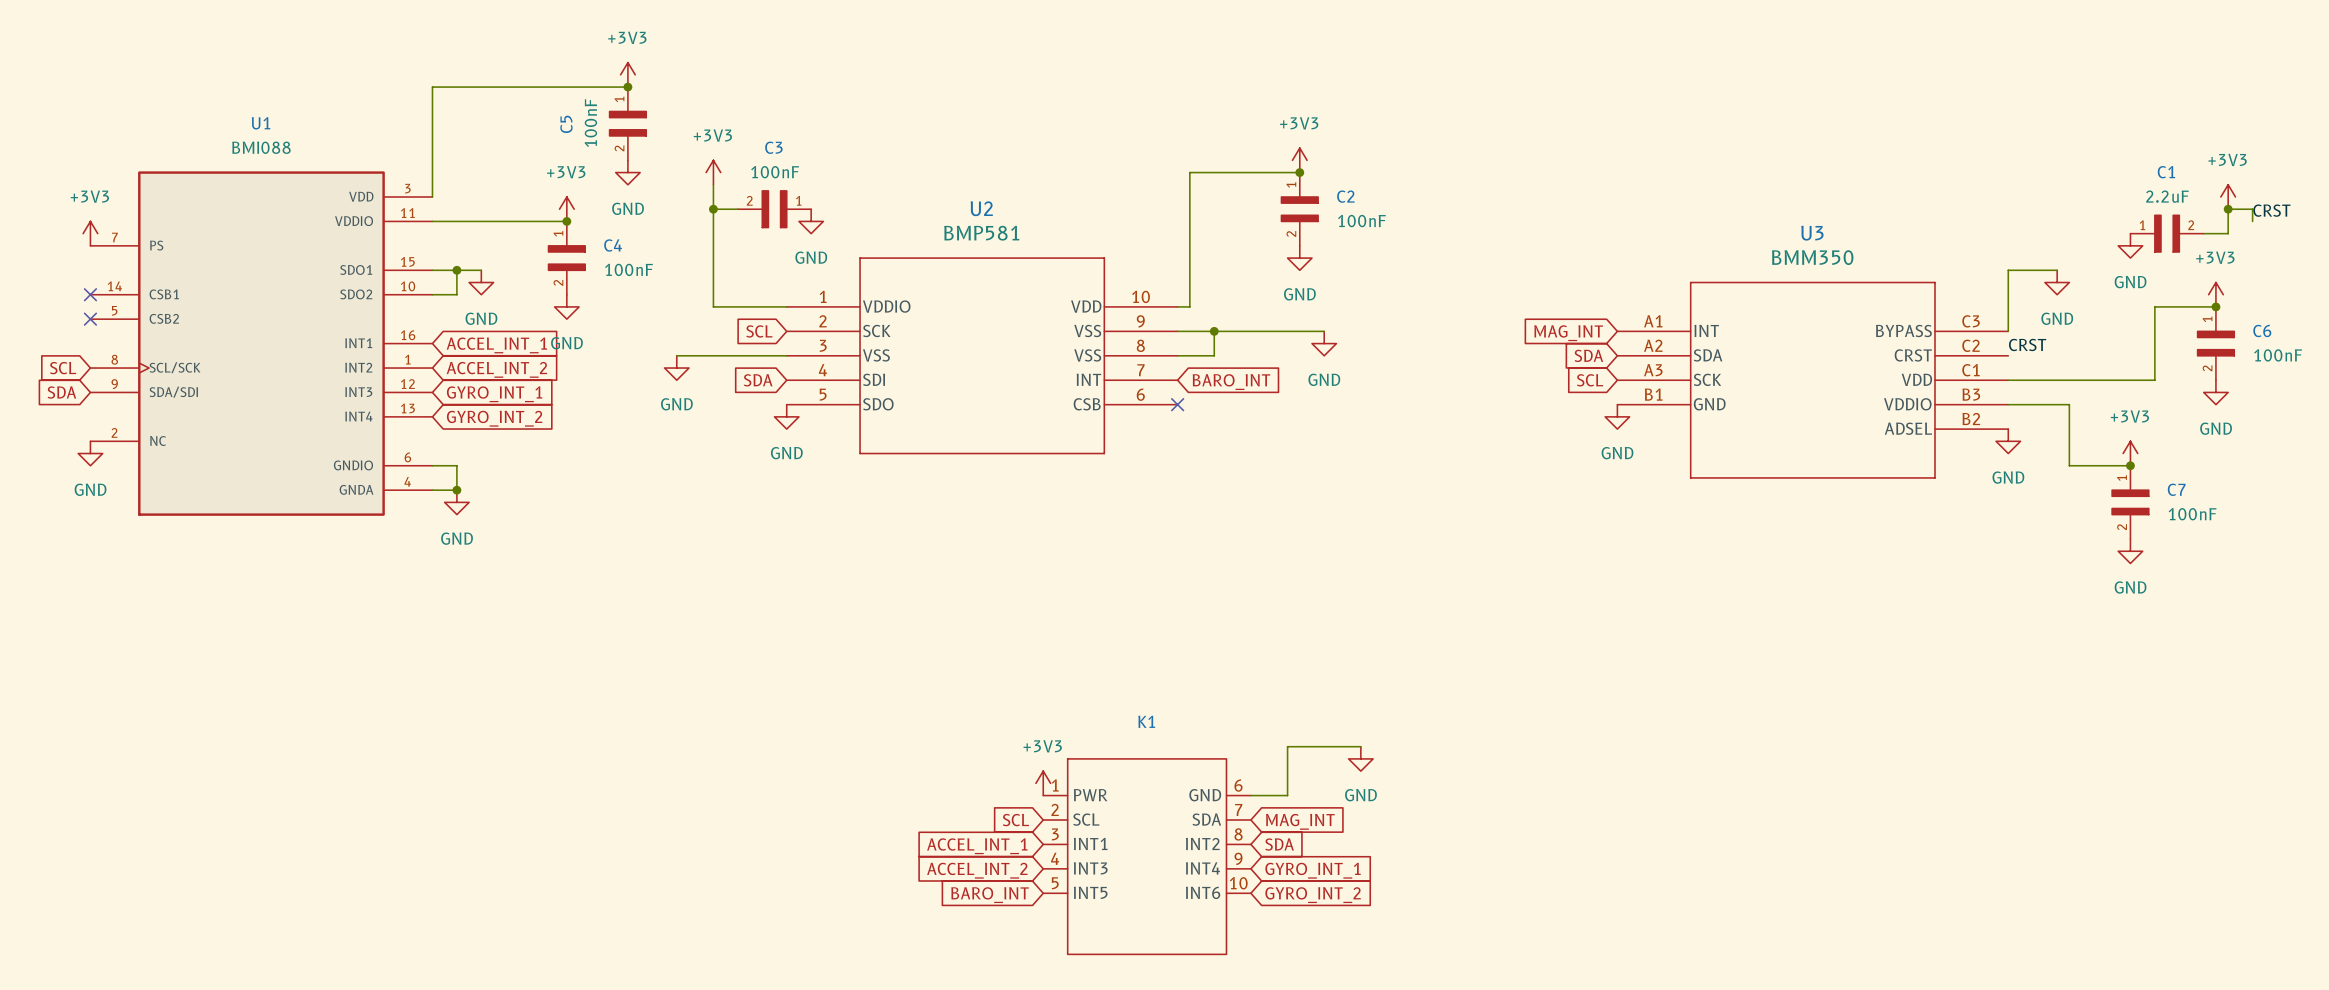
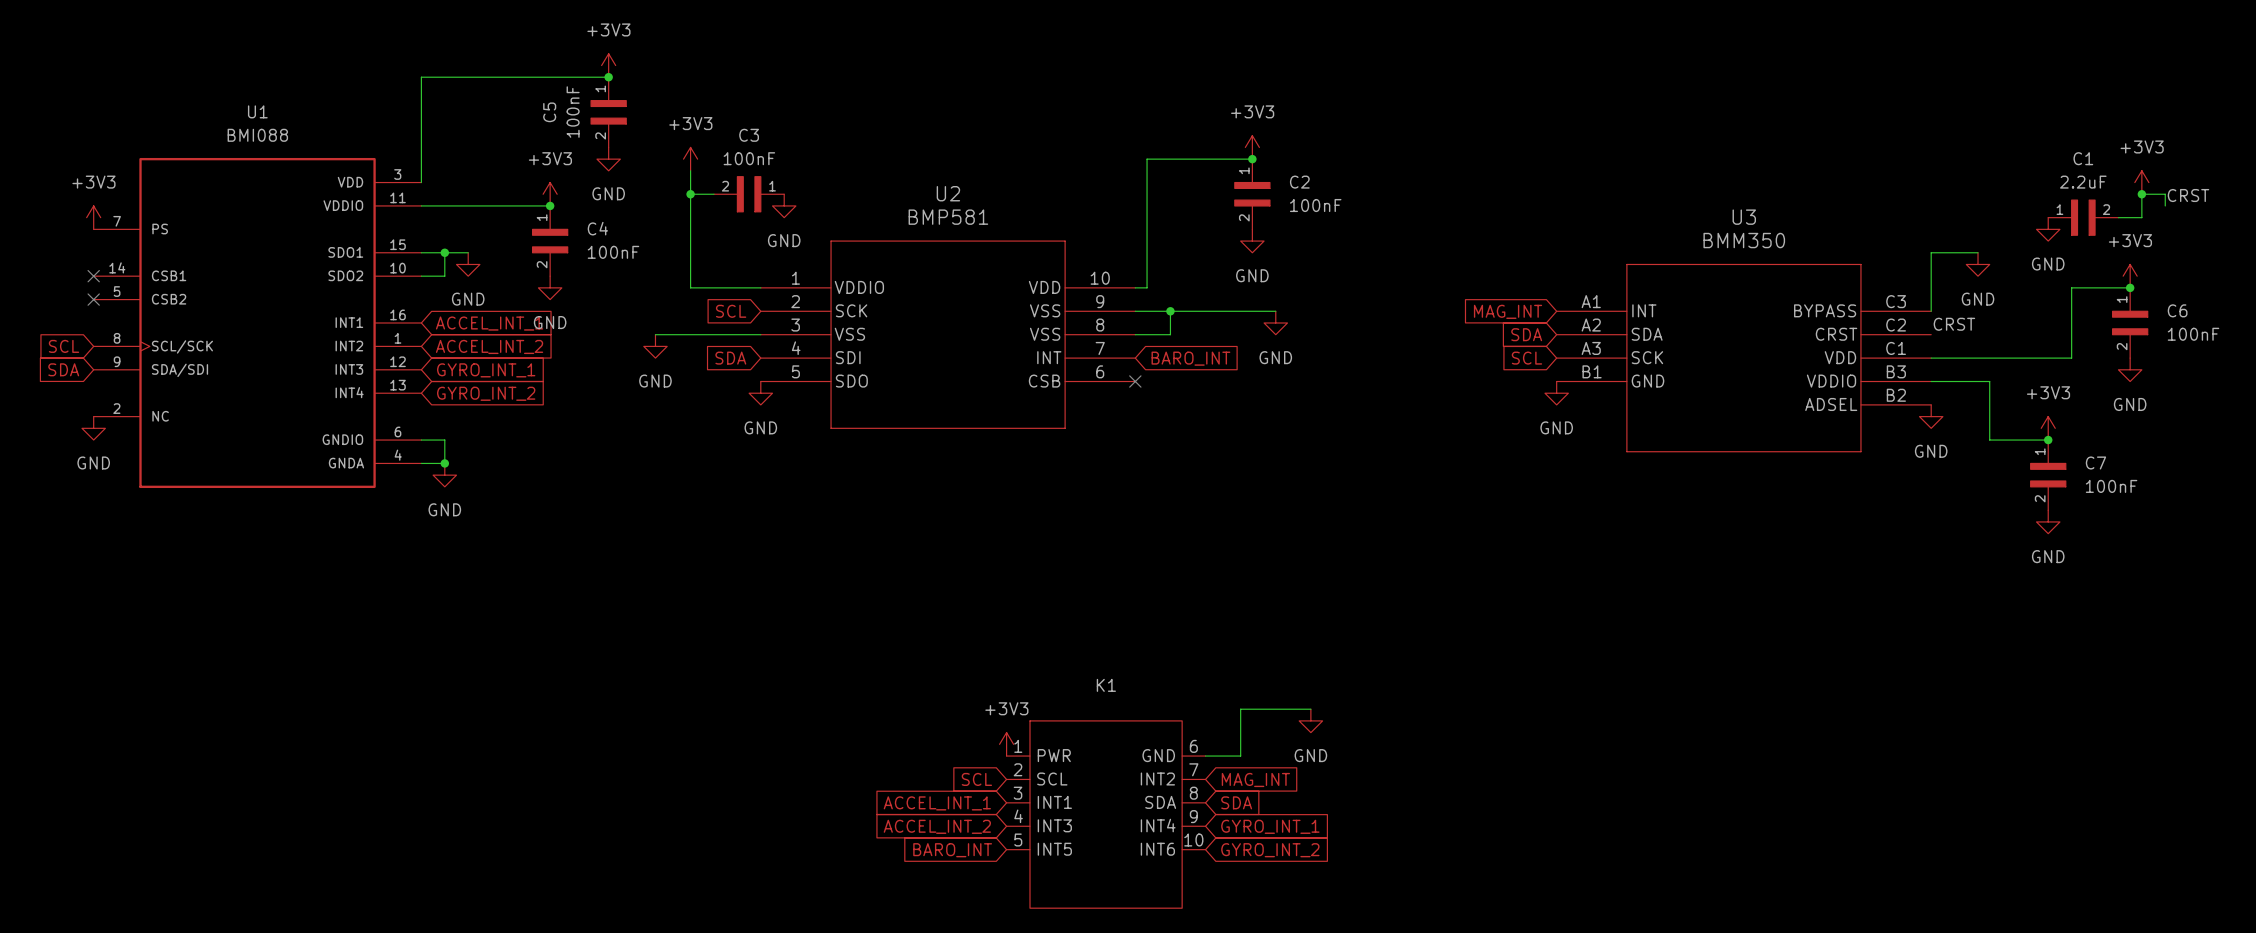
K1 pin name: SDA (1206, 819) -> INT2 (1157, 779)
K1 pin name: INT2 (1202, 843) -> SDA (1160, 802)

